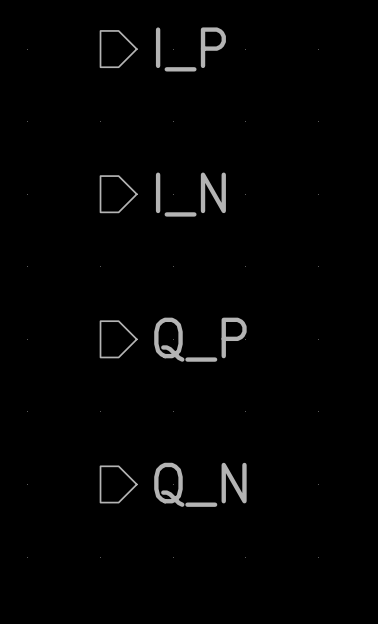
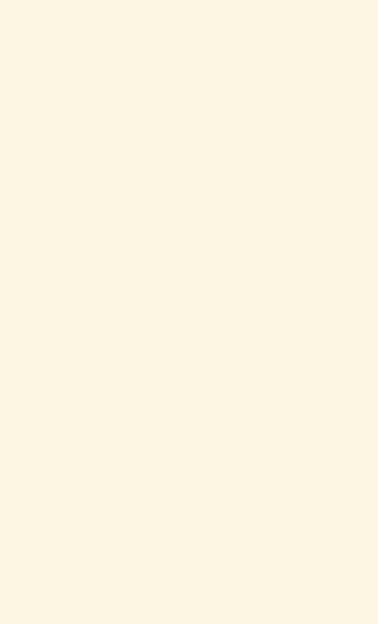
hierarchical label: I_P (190, 49) -> none
hierarchical label: I_N (190, 194) -> none
hierarchical label: Q_P (200, 339) -> none
hierarchical label: Q_N (200, 484) -> none

